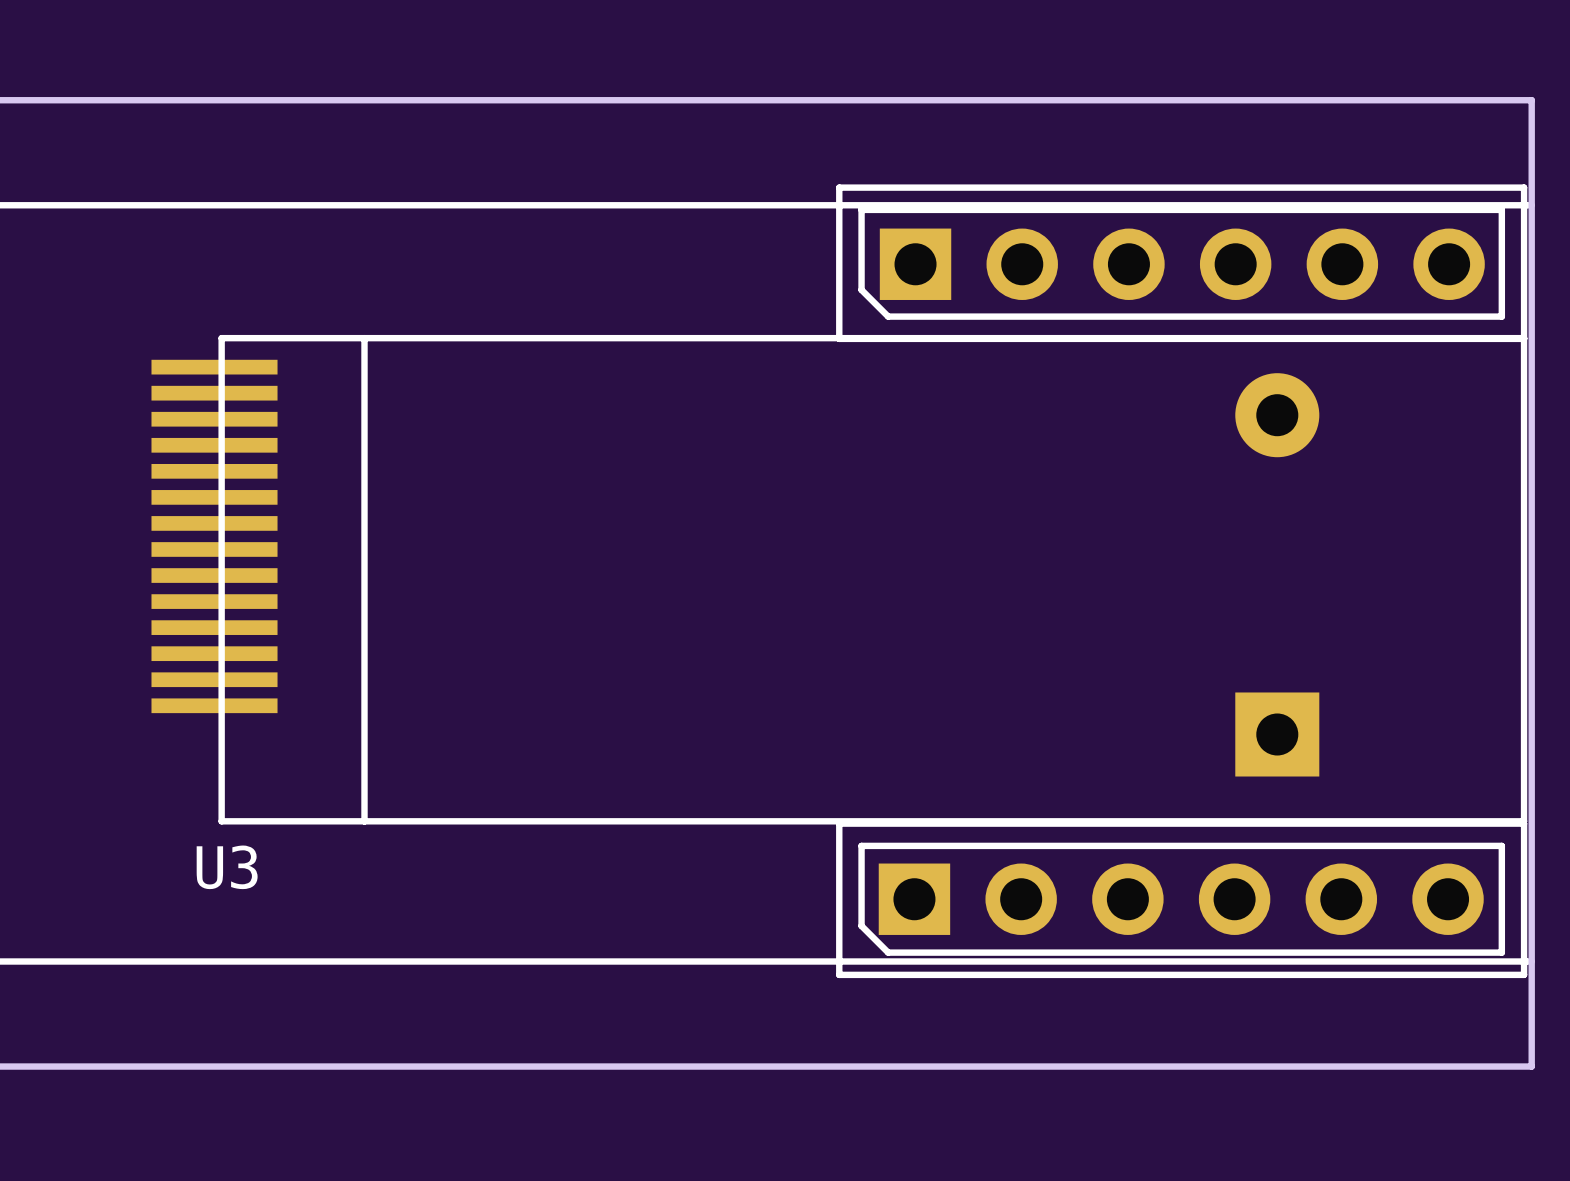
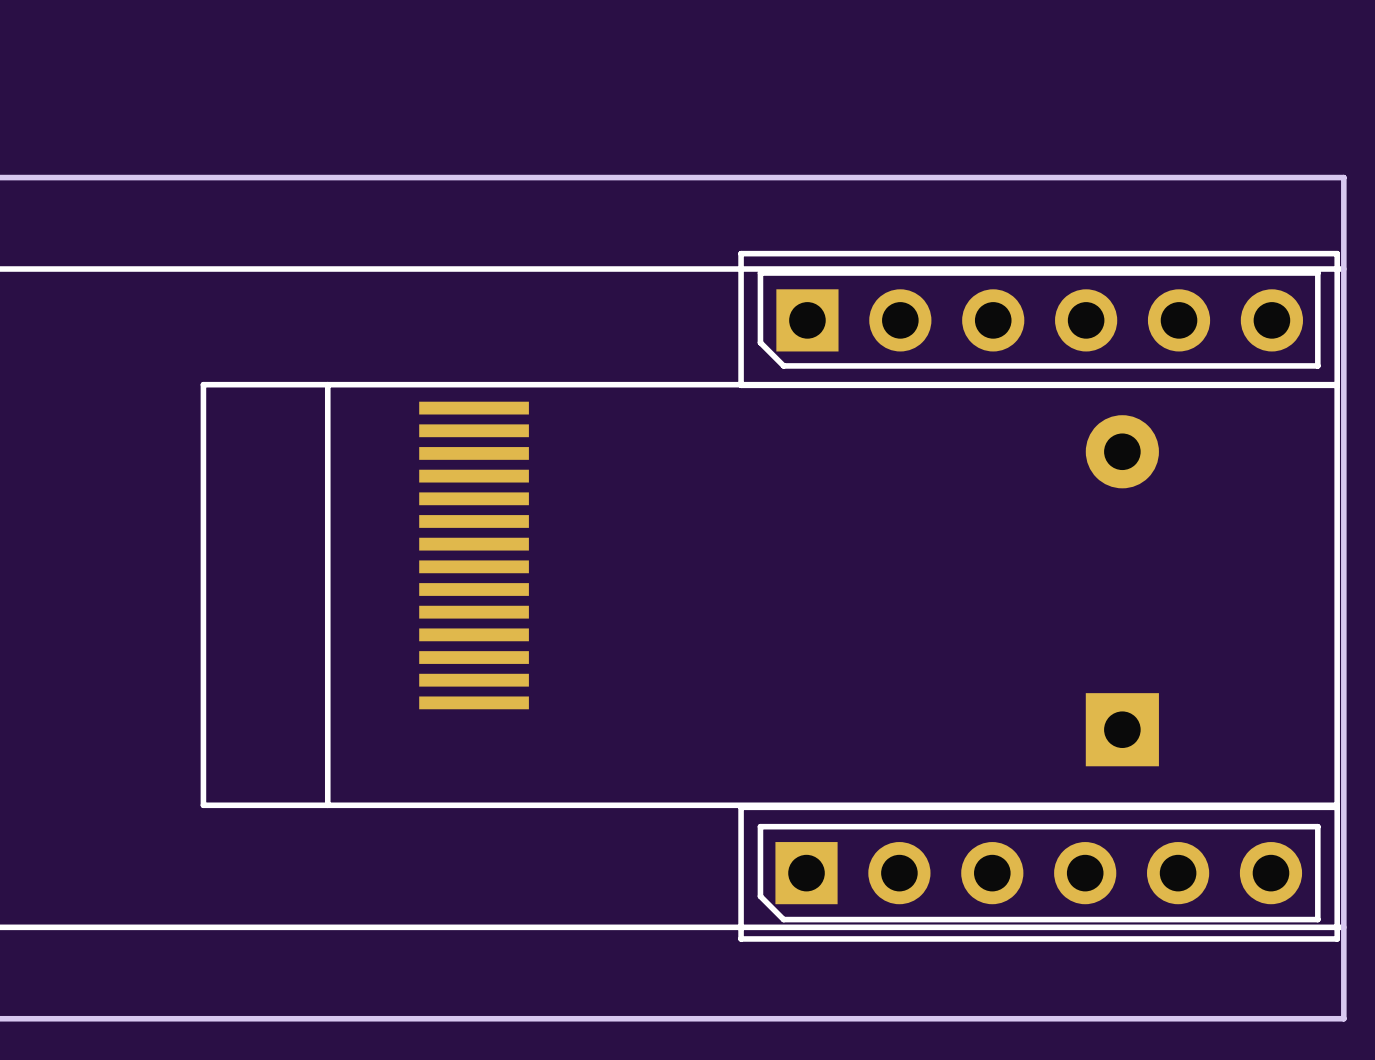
U3: (839, 579) -> none
part: none -> (770, 594)

